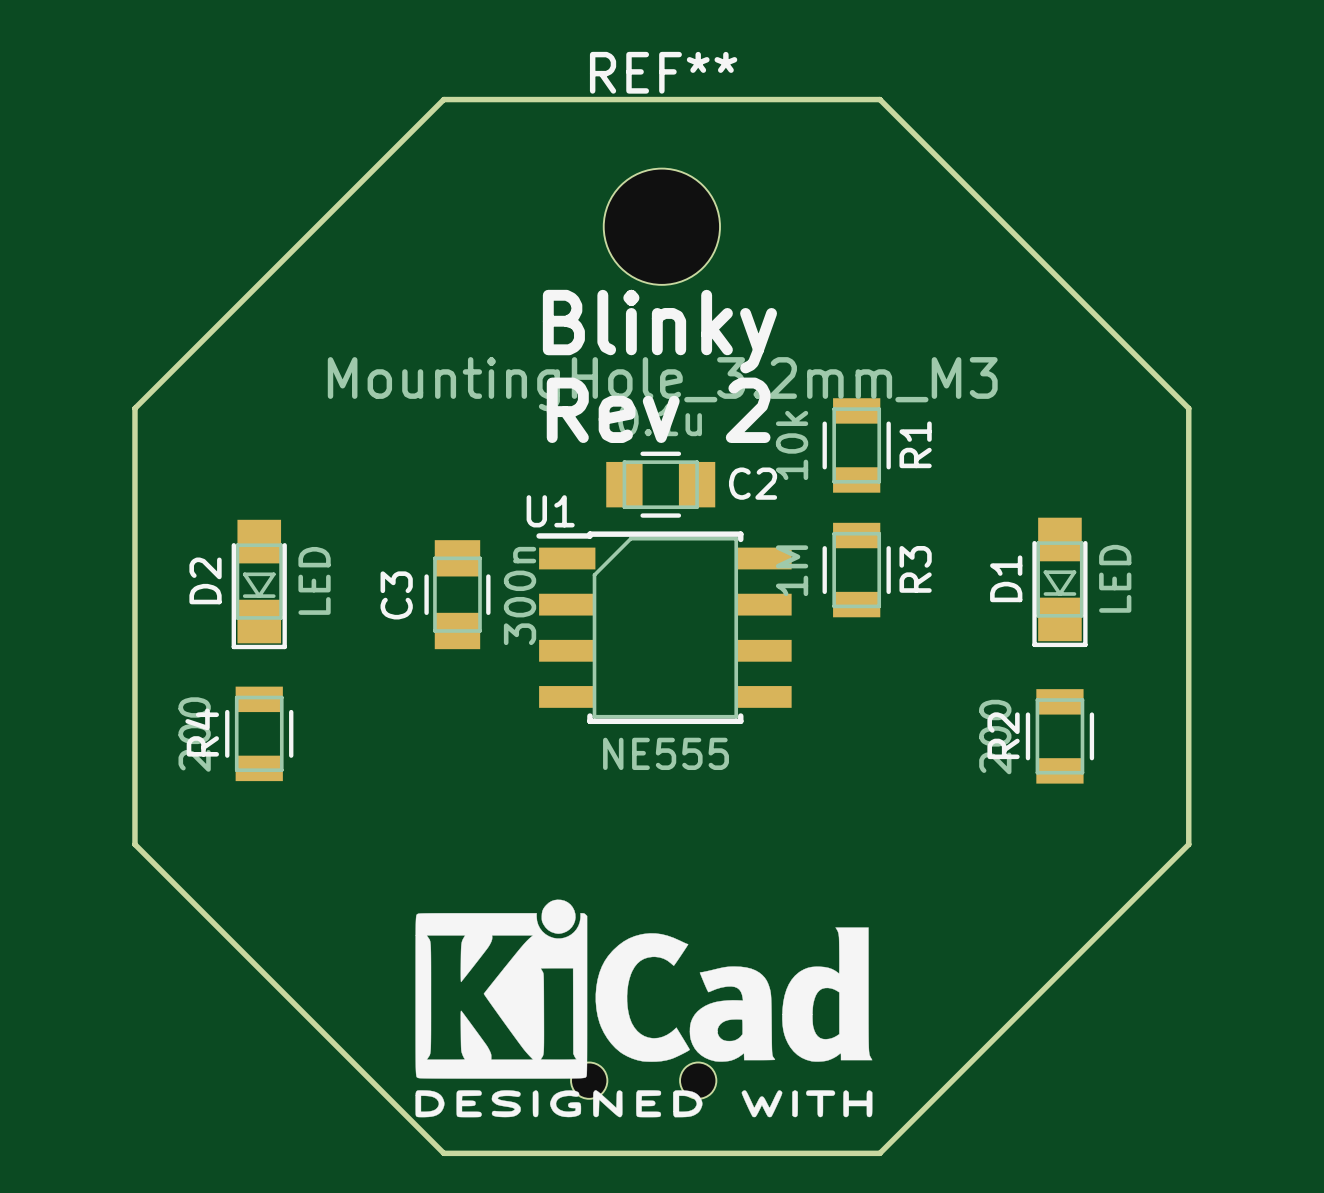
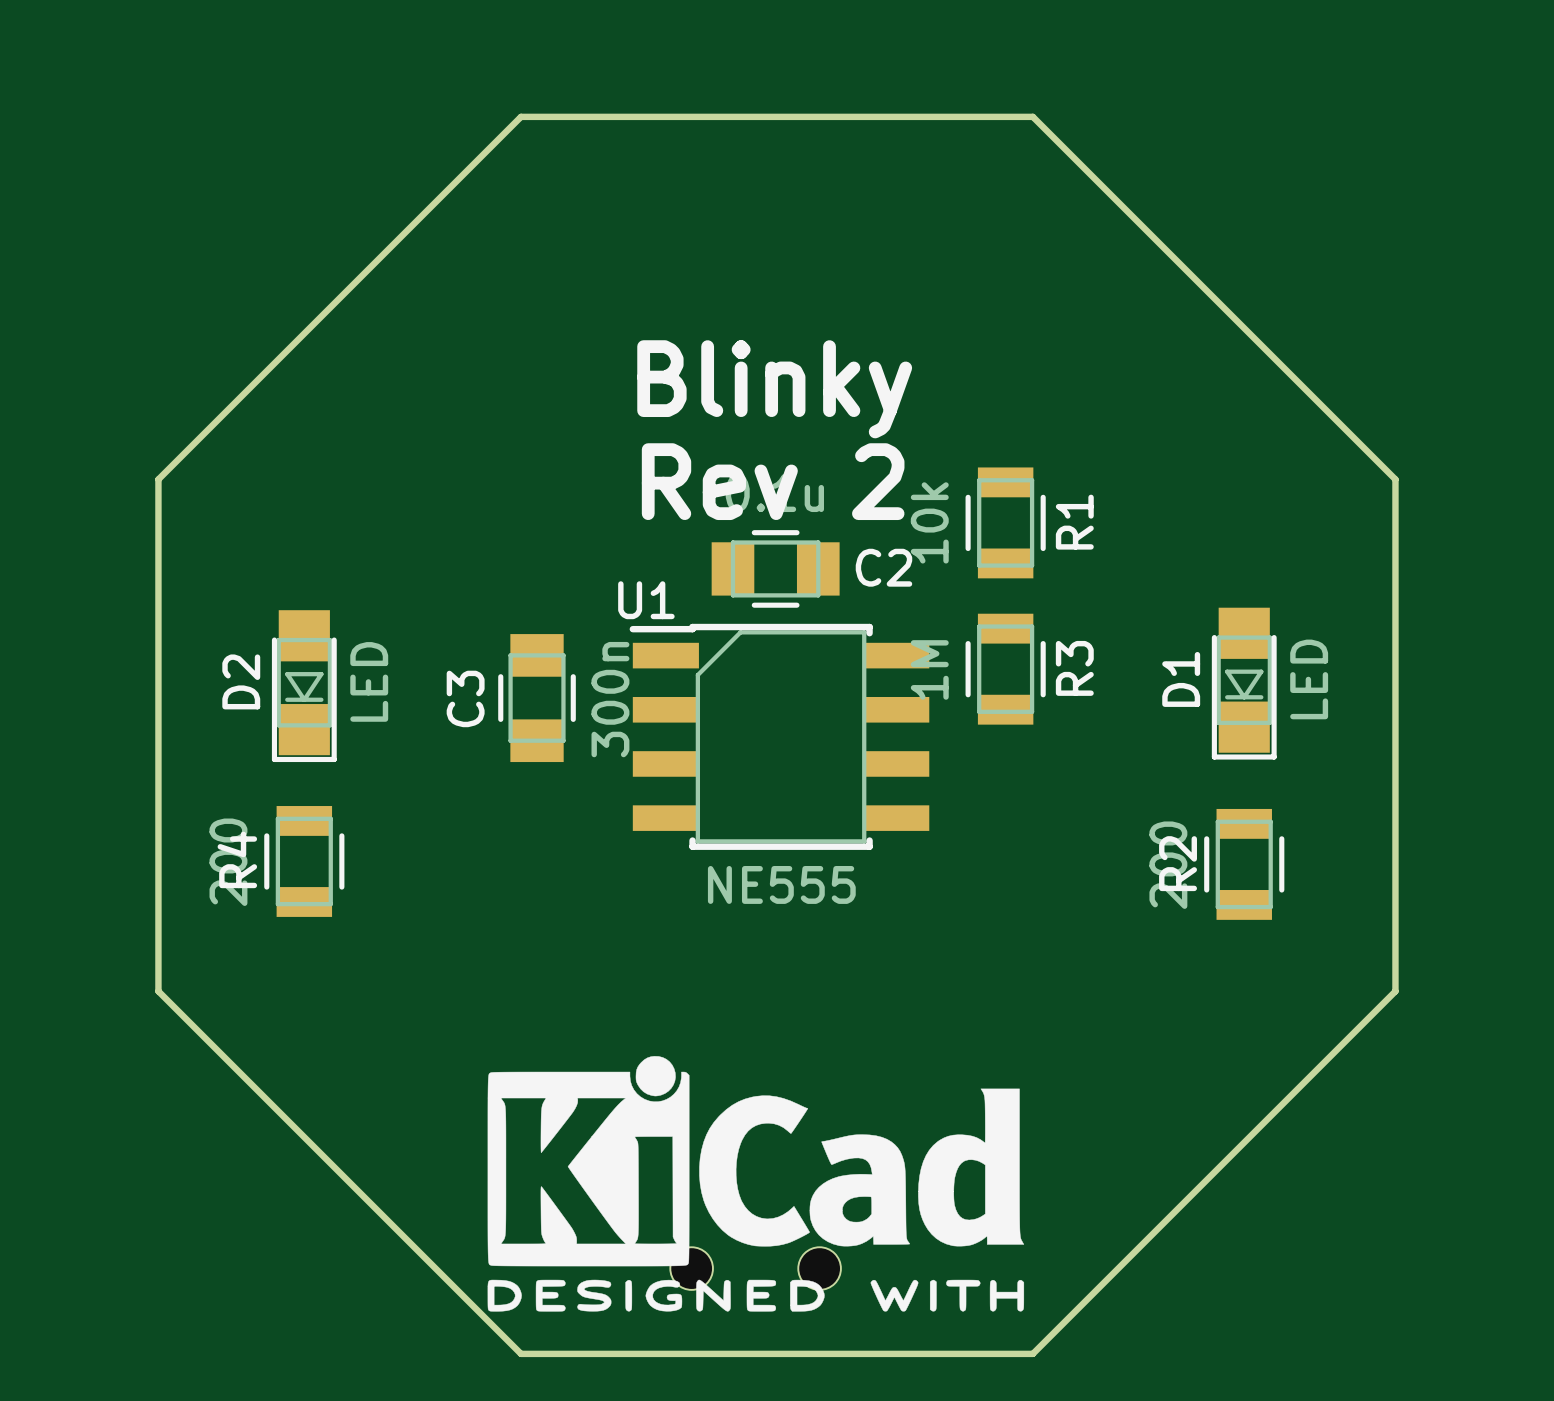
REF**: MountingHole_3.2mm_M3 (661, 226) -> none

